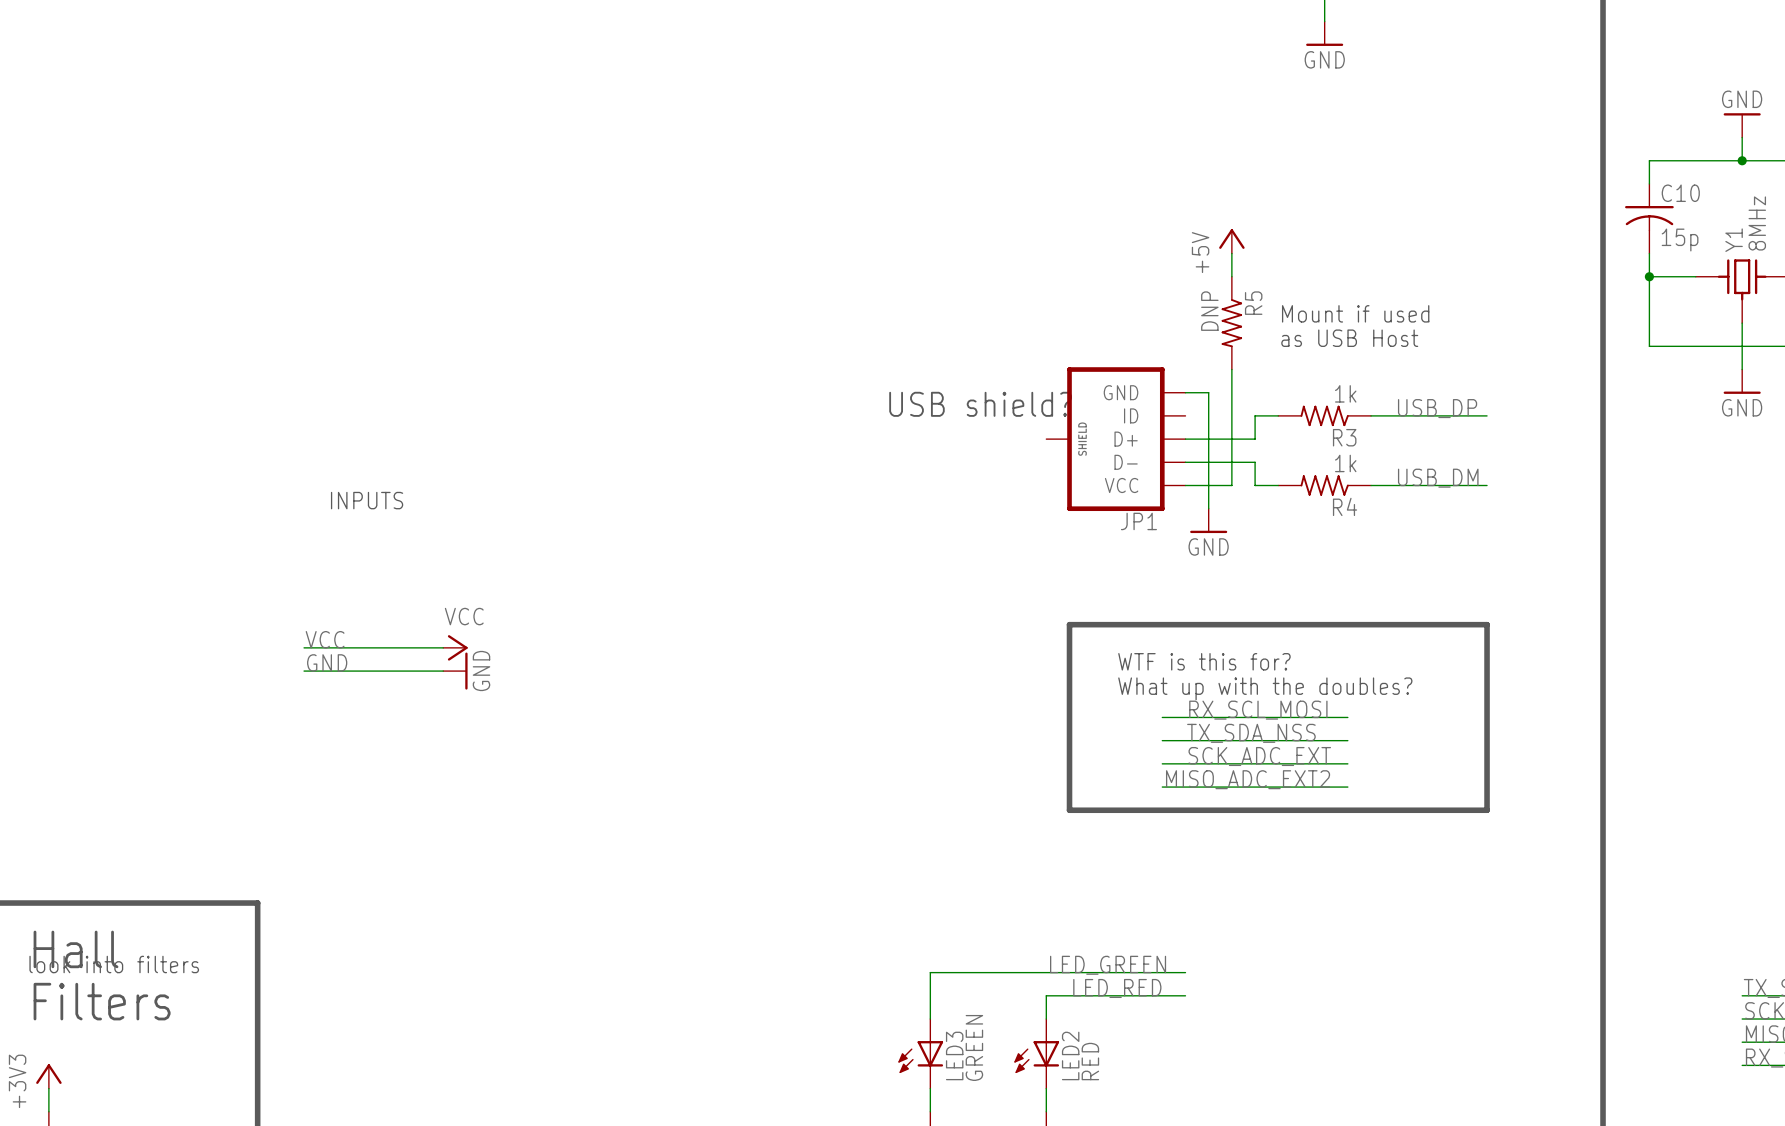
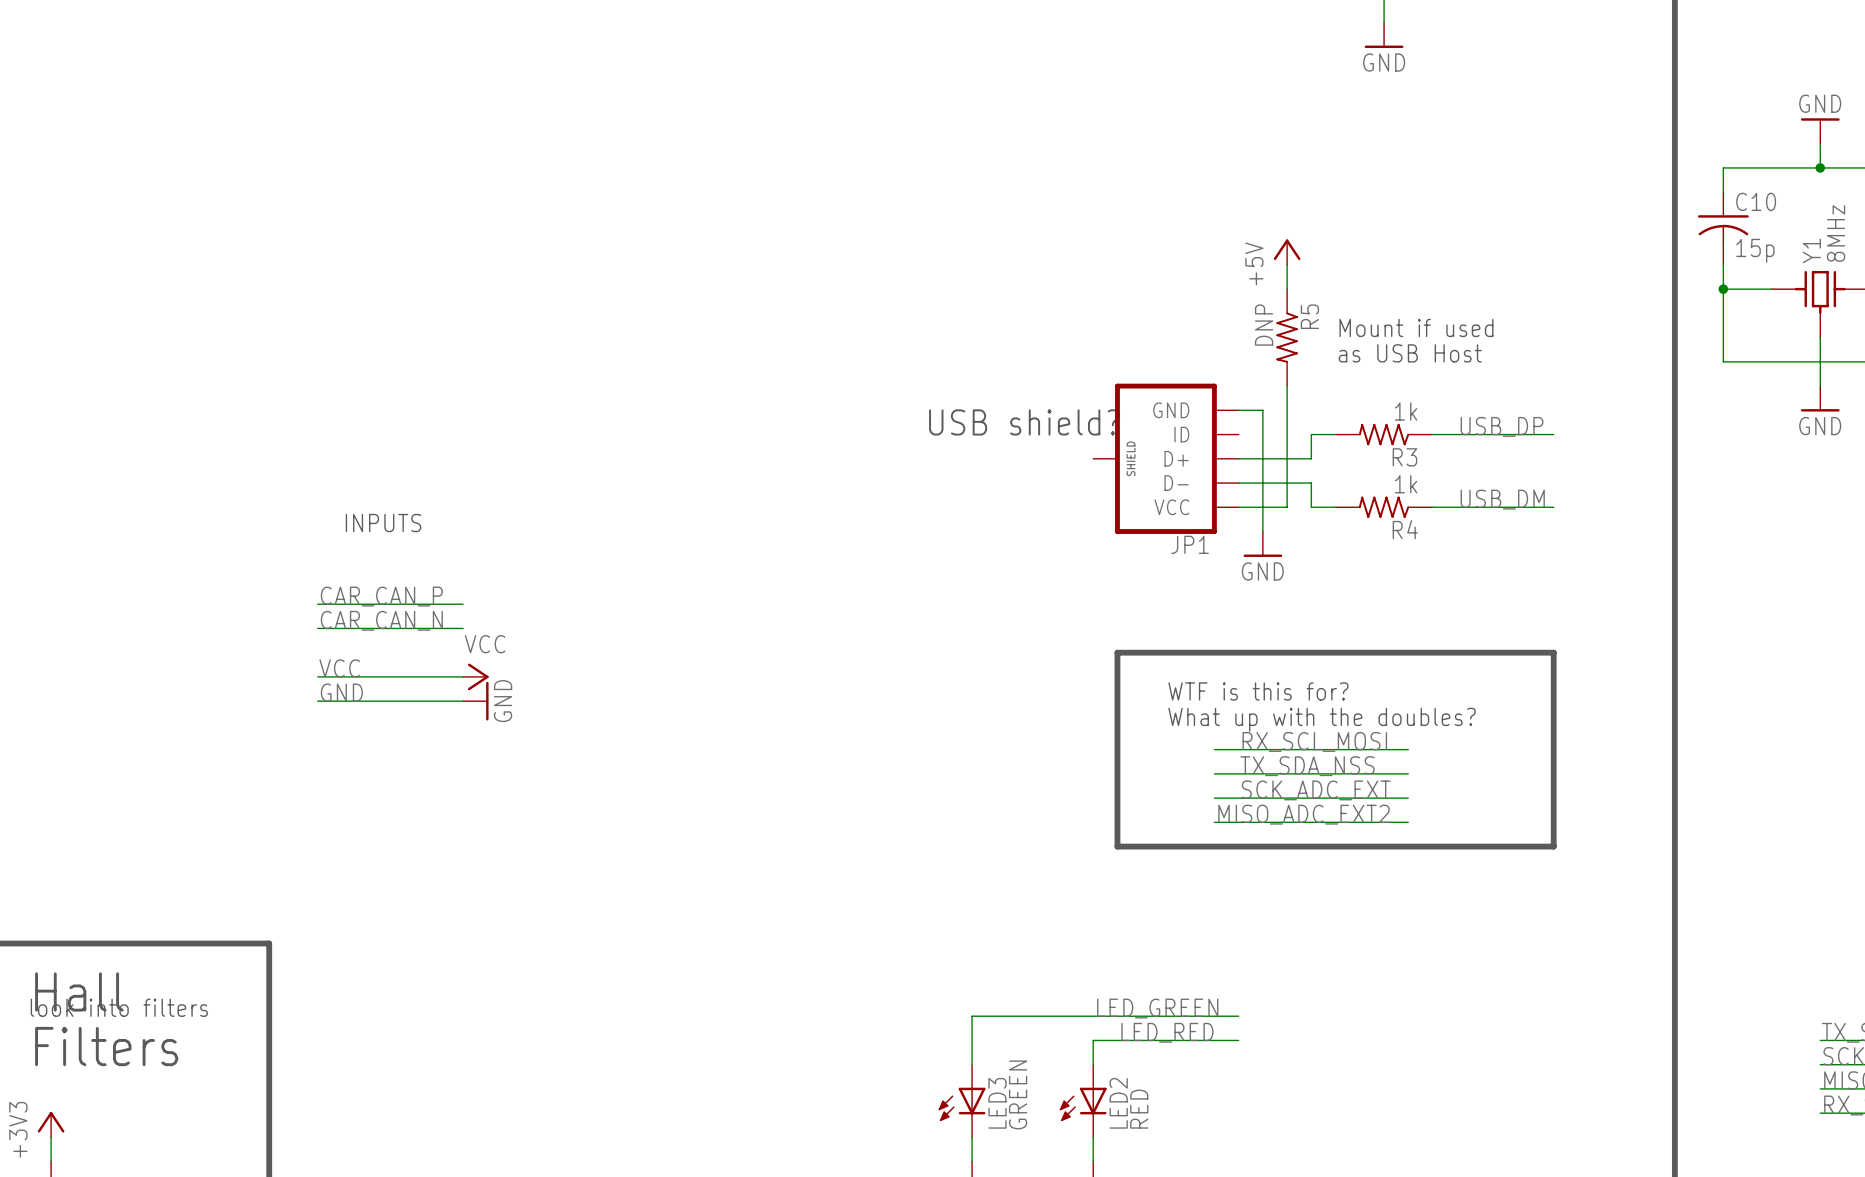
label: none -> CAR_CAN_P (381, 596)
wire: none -> (317, 604) (463, 604)
label: none -> CAR_CAN_N (381, 620)
wire: none -> (317, 628) (463, 628)

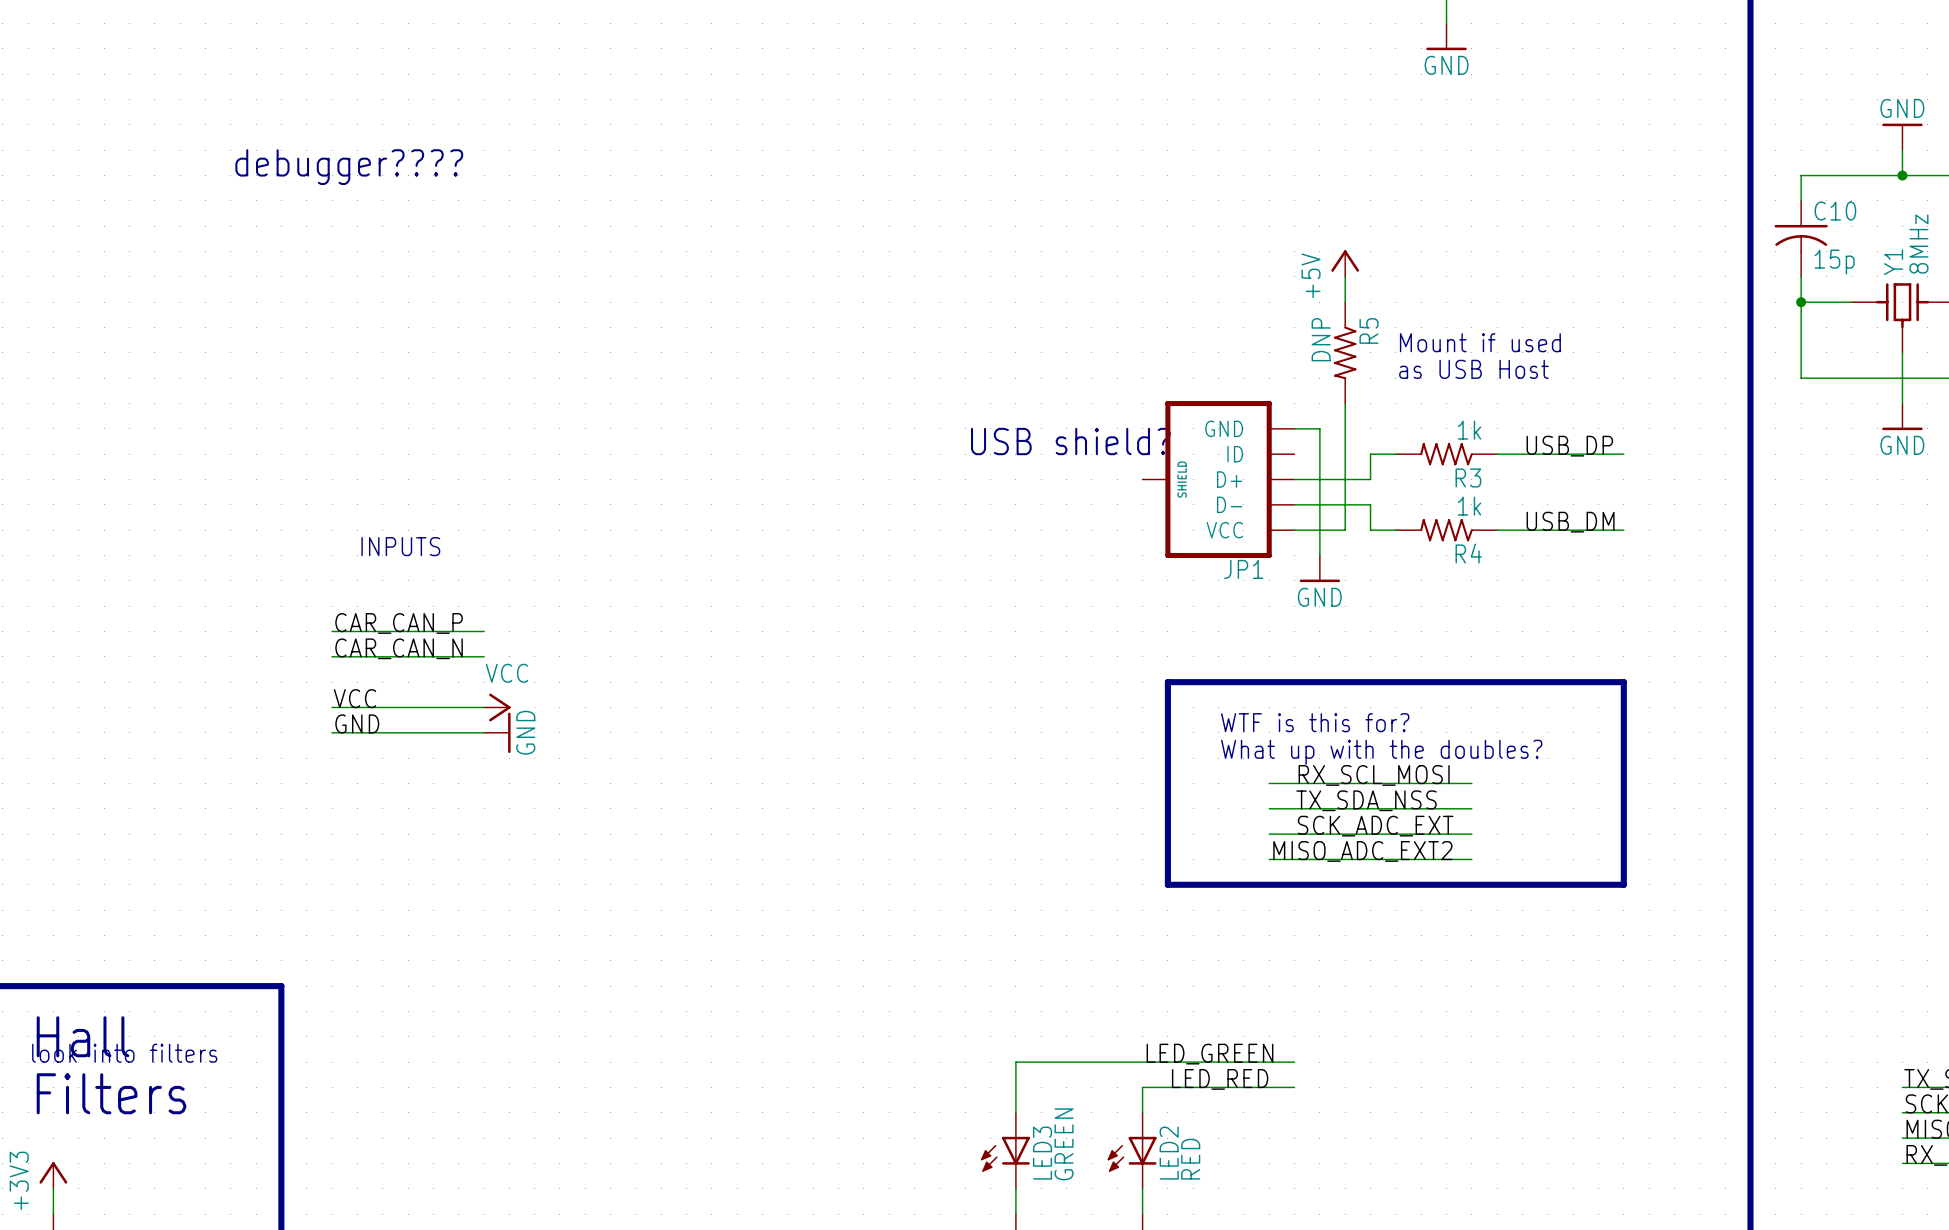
text: none -> debugger???? (349, 167)

